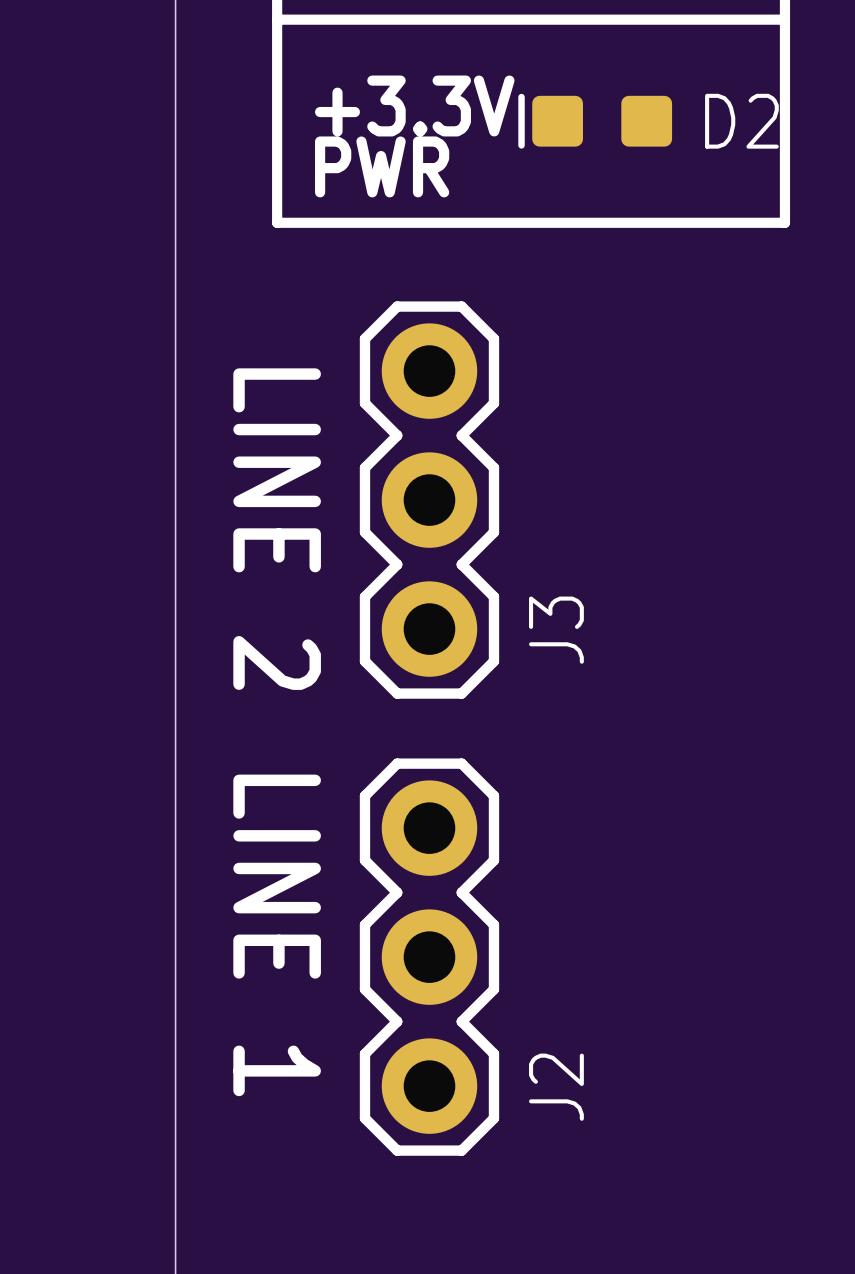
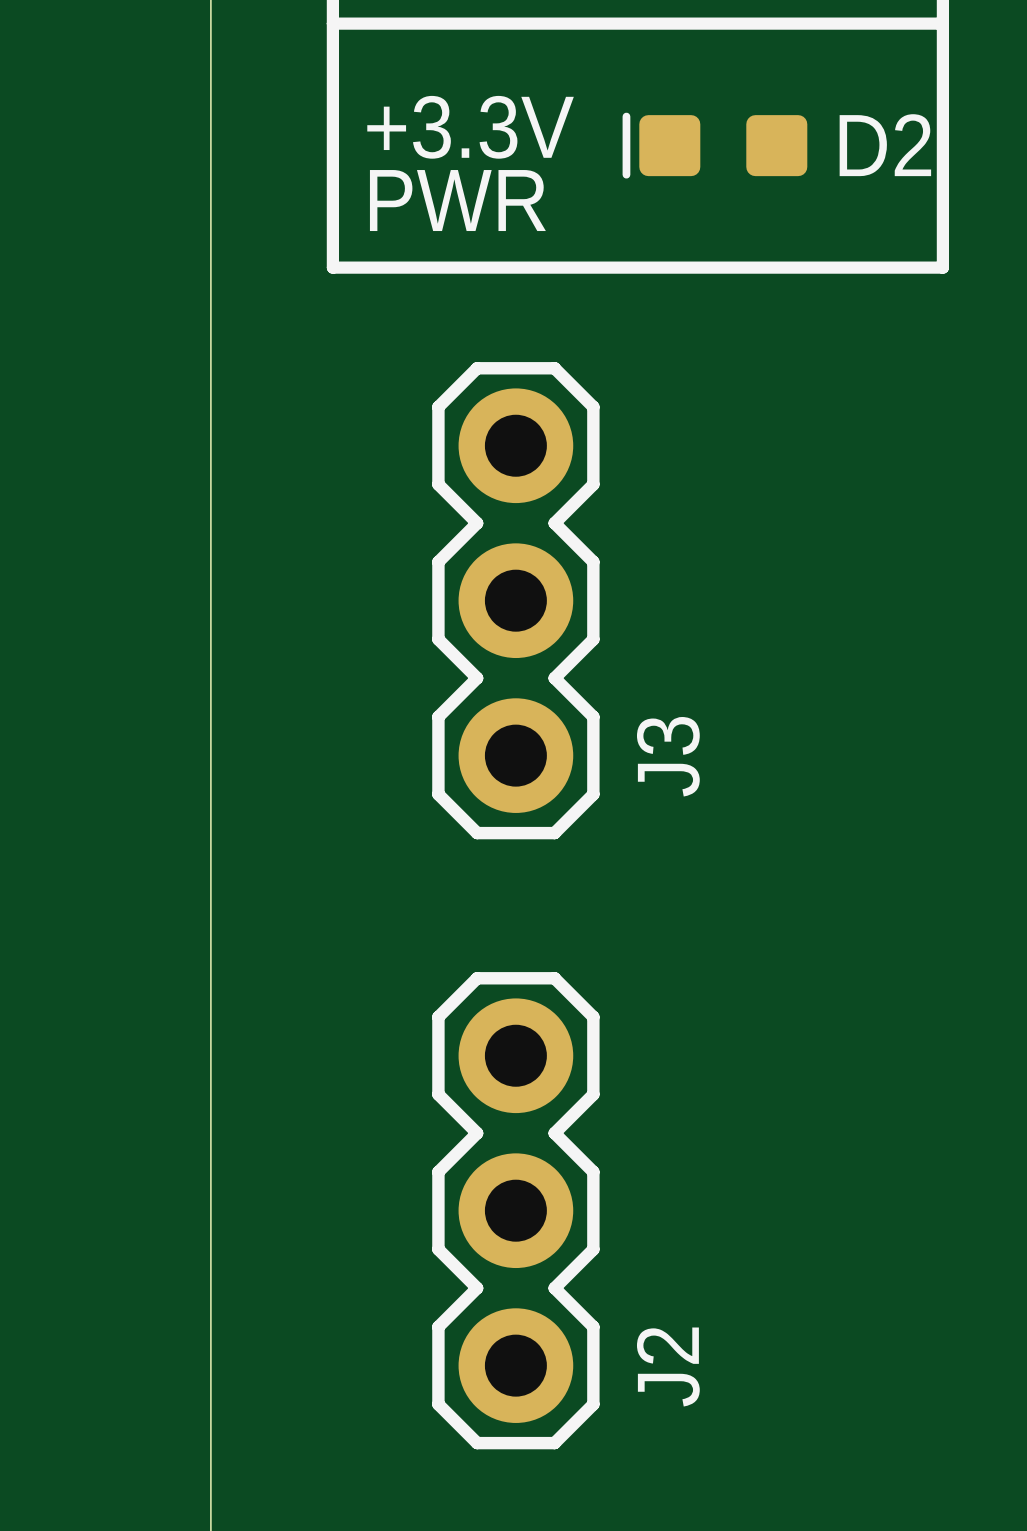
text: LINE 2 (277, 529) -> none
text: LINE 1 (277, 935) -> none
J2 position: (429, 957) -> (515, 1210)

